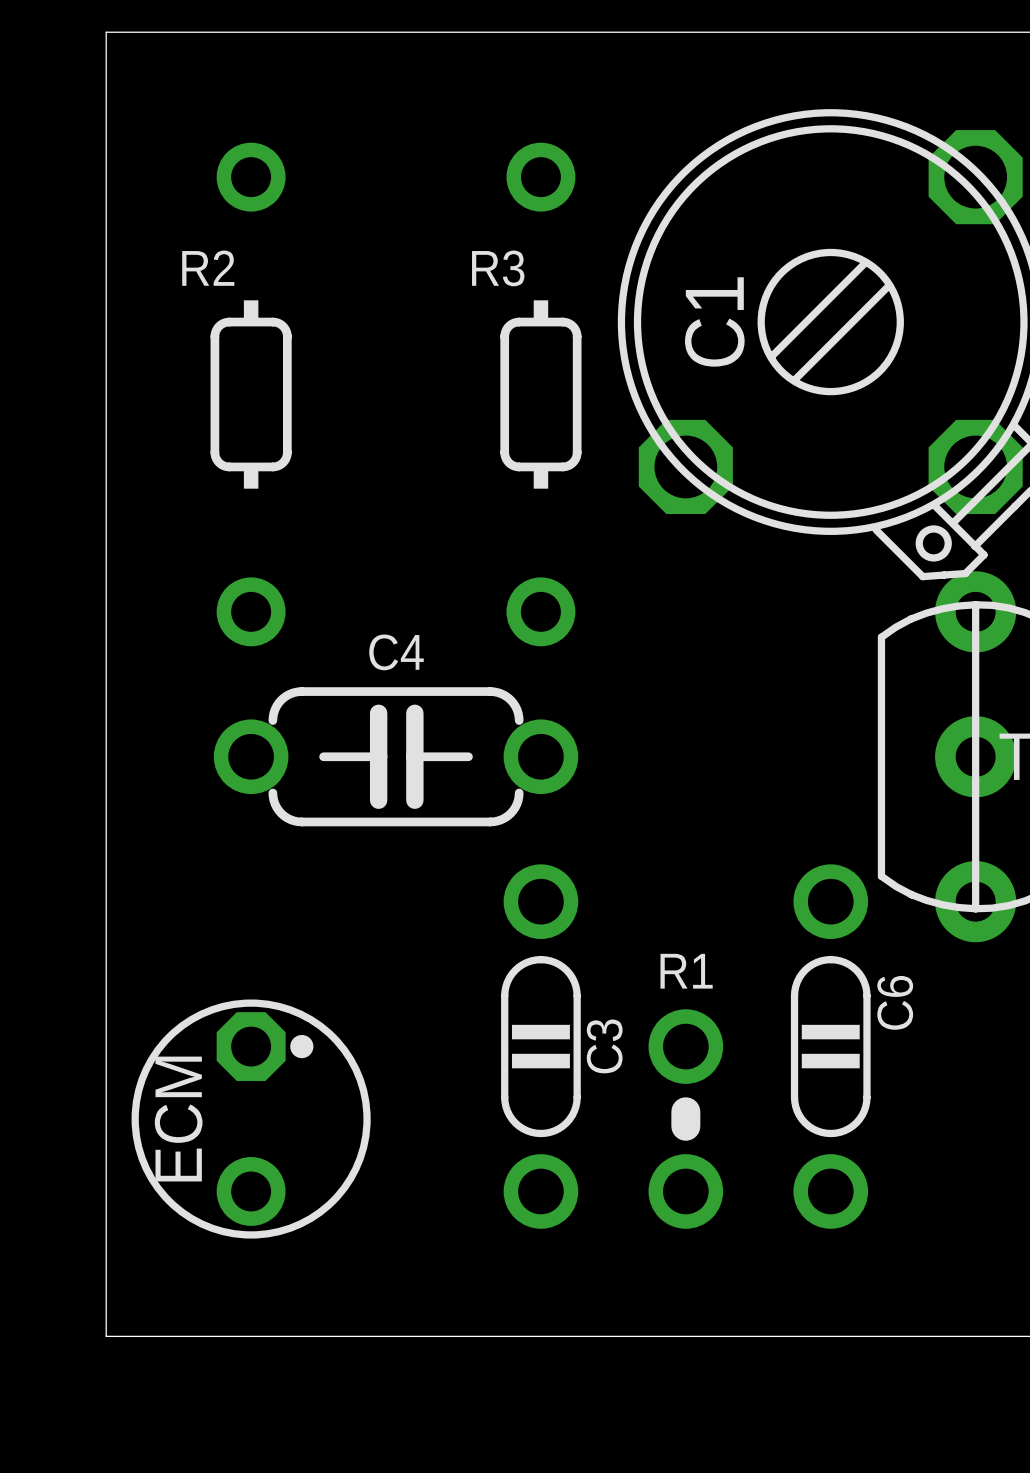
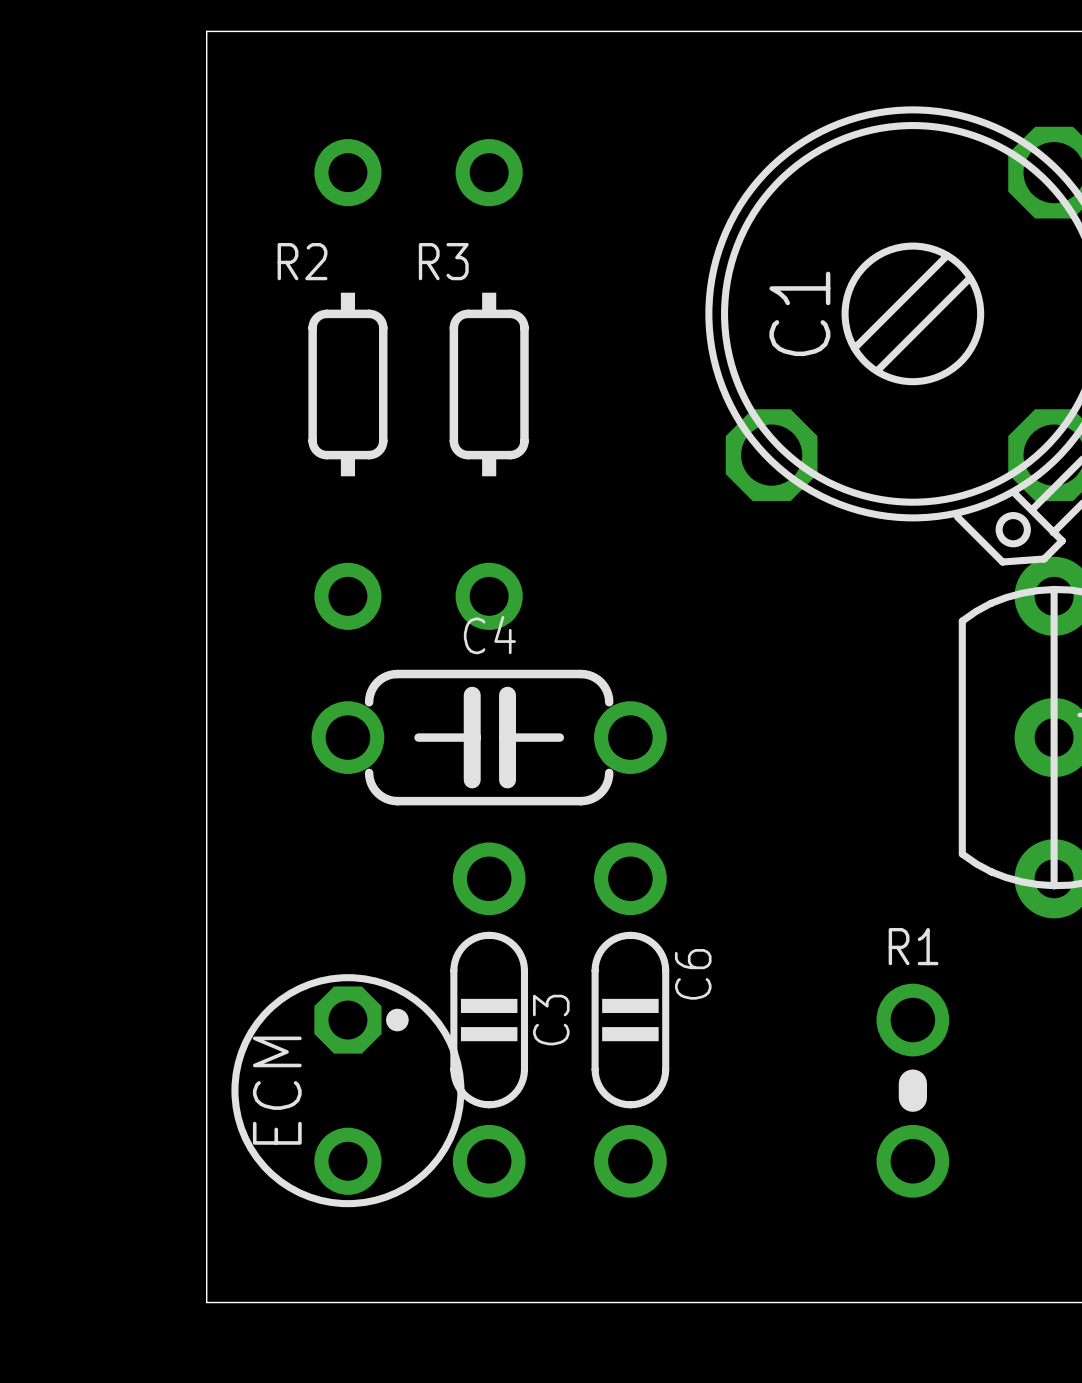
R3 position: (540, 394) -> (489, 384)
C3: none -> (489, 1020)
C3 name: C3 (604, 1046) -> C6 (693, 974)
C6: (830, 1046) -> none
R1 position: (685, 1119) -> (912, 1090)

